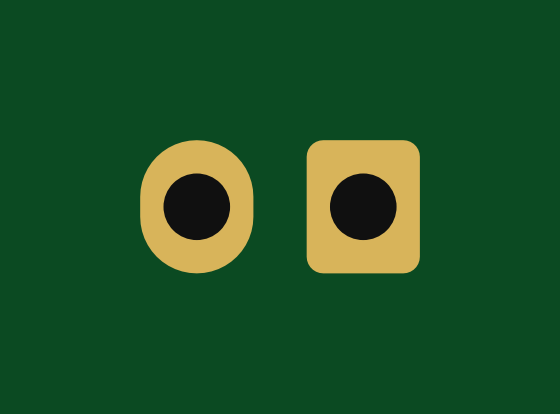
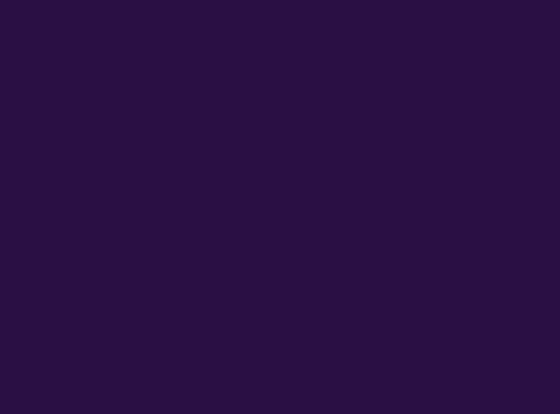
part: (280, 206) -> none

